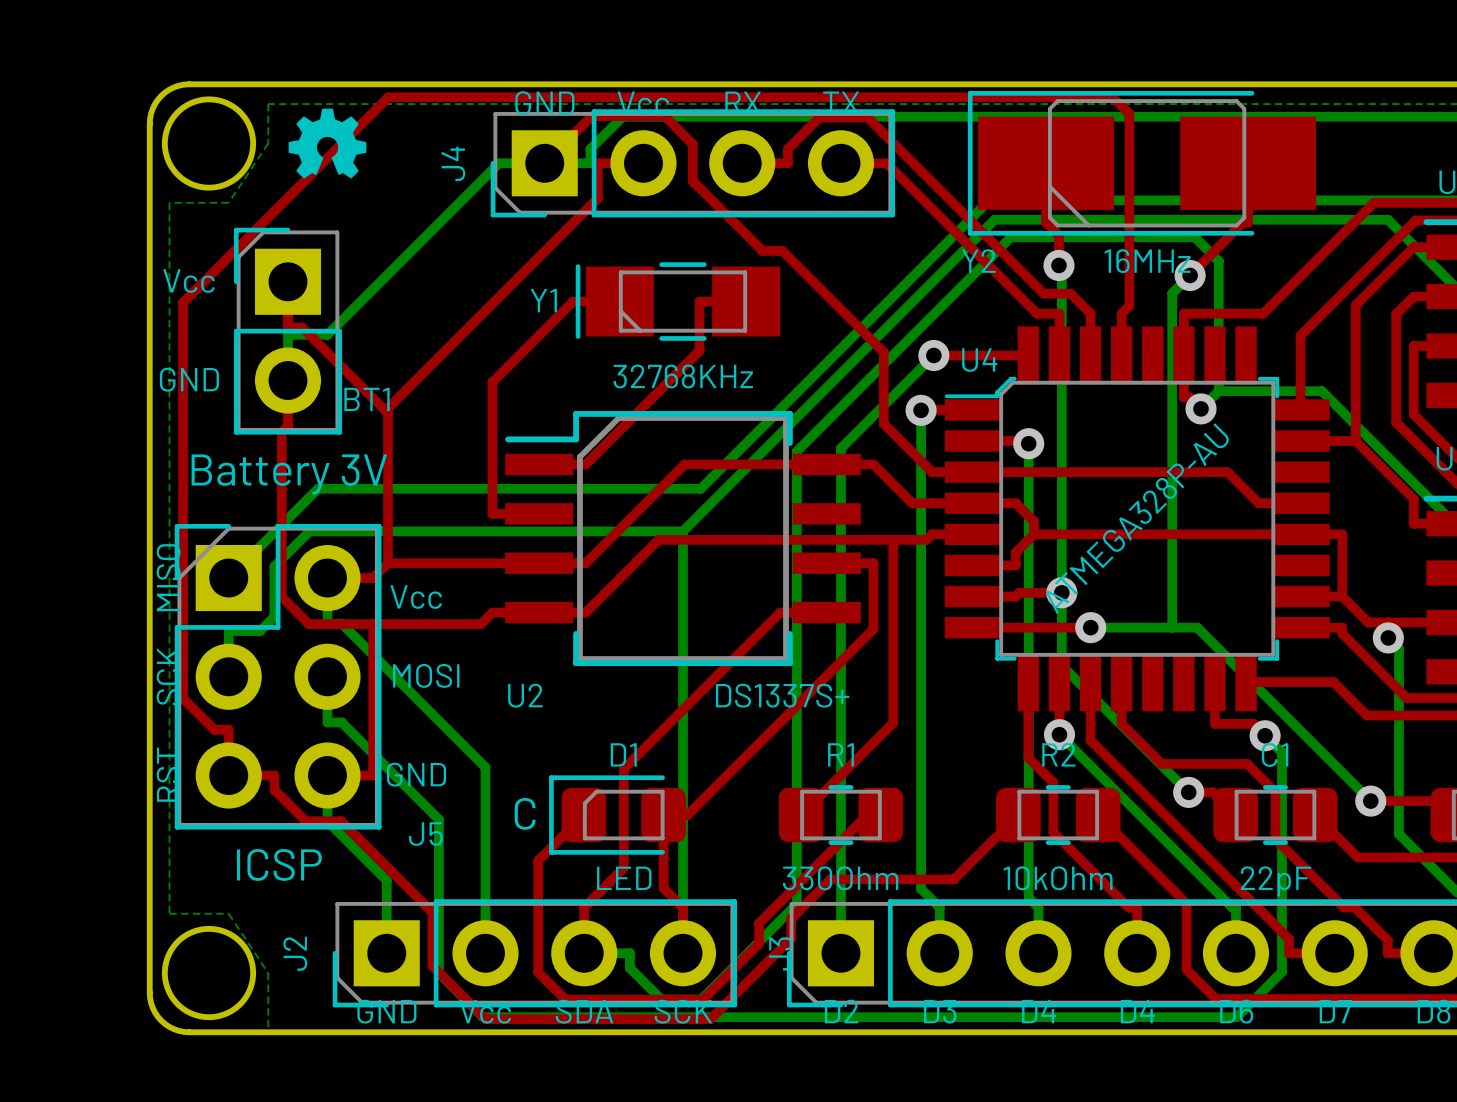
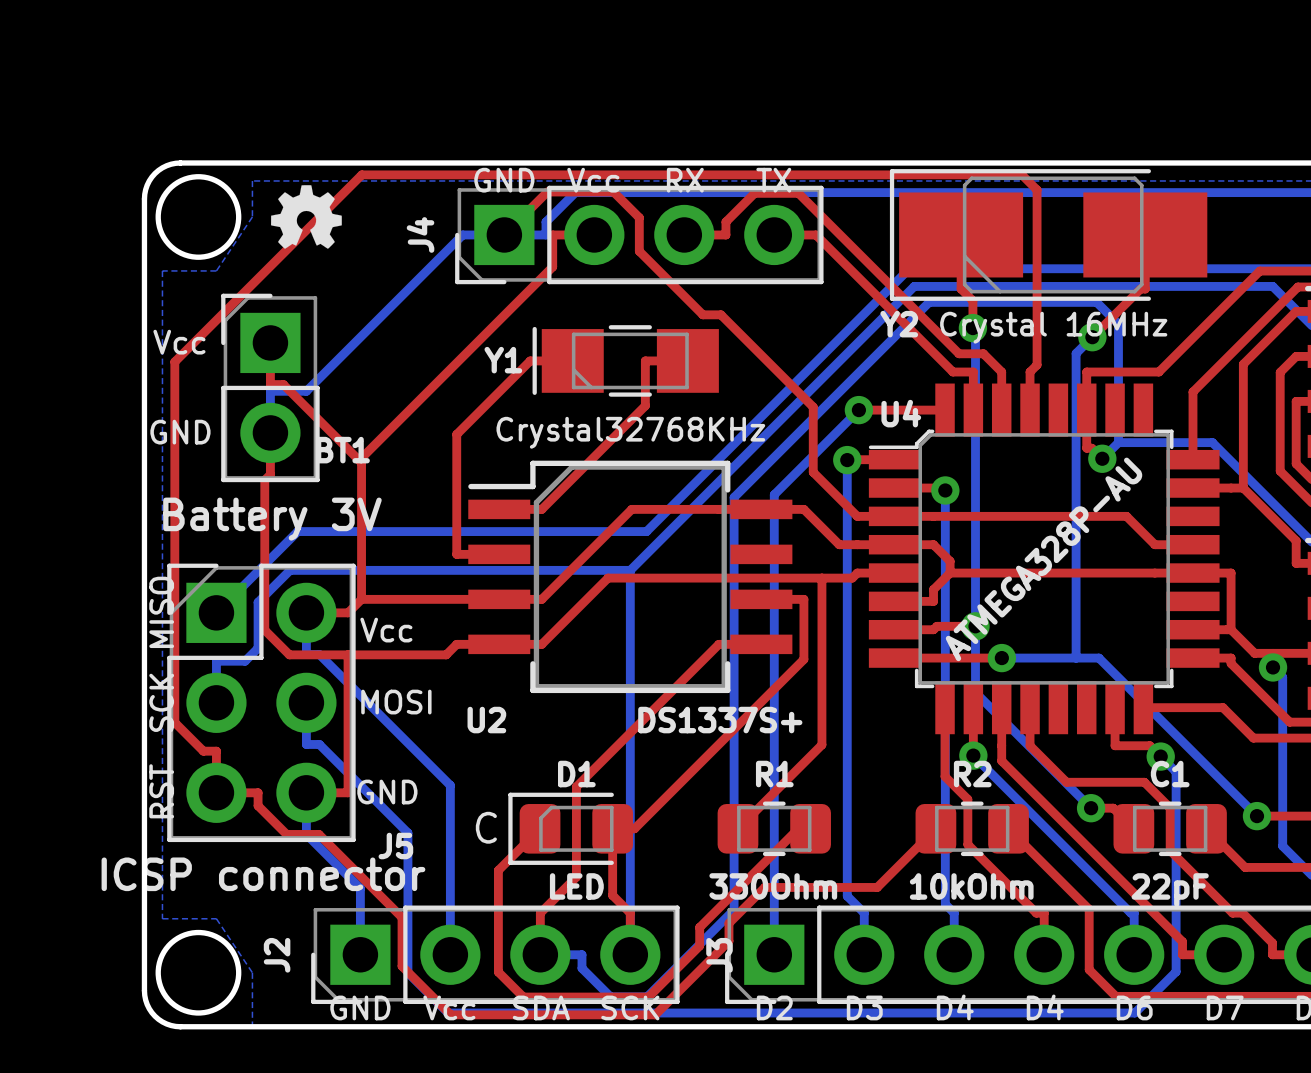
Y2 value: 16MHz (1147, 261) -> Crystal 16MHz (1053, 327)
Y1 value: 32768KHz (683, 376) -> Crystal32768KHz (630, 432)
J5 value: ICSP (279, 864) -> ICSP connector (263, 874)

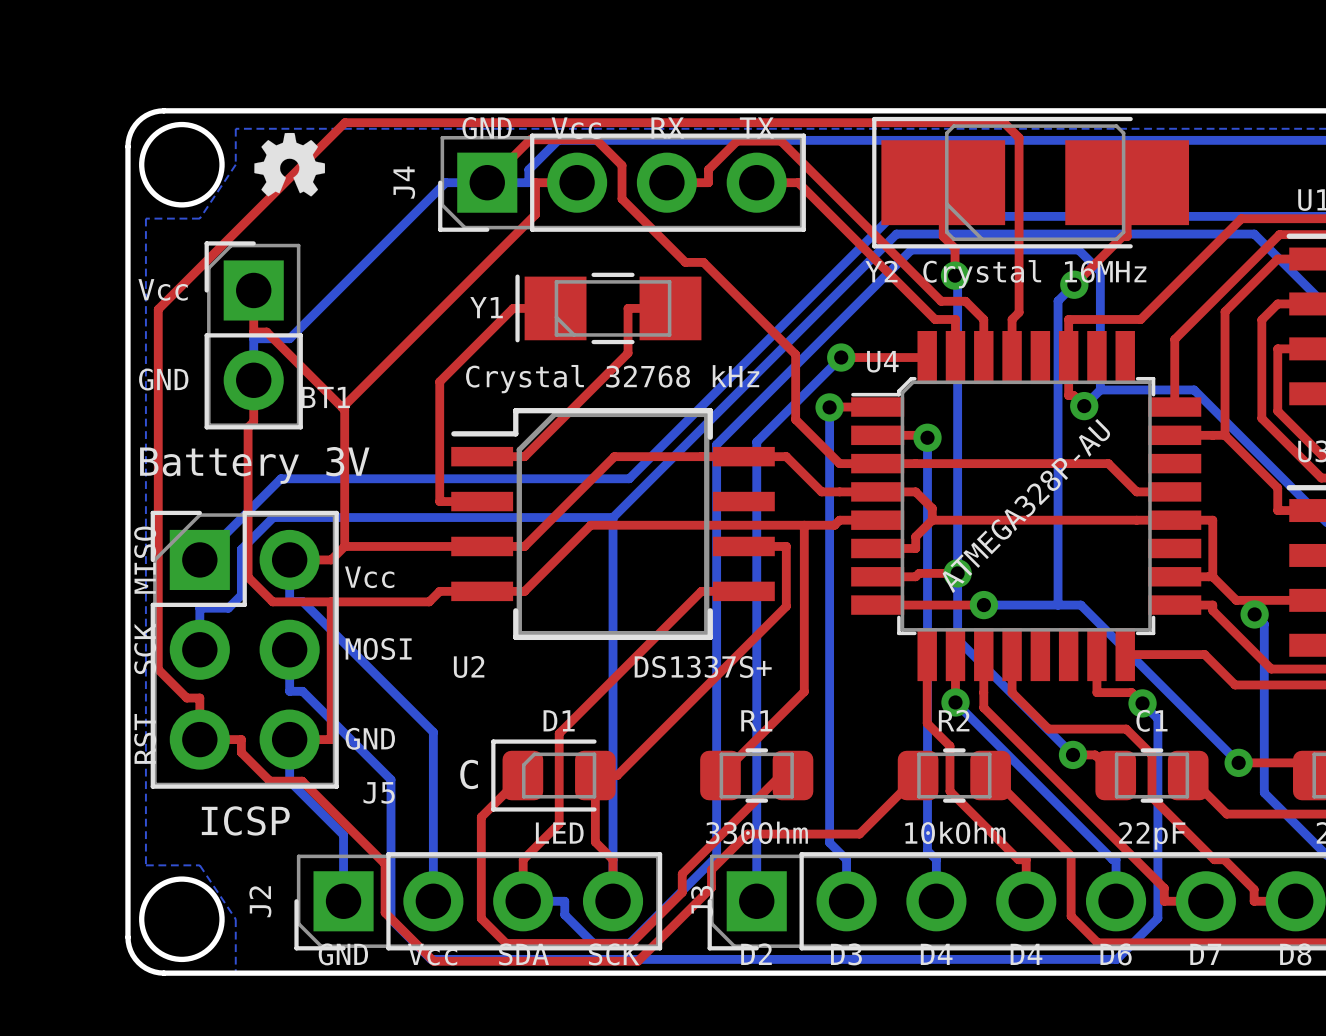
Y1 value: Crystal32768KHz (630, 432) -> Crystal 32768 kHz (612, 379)
J5 value: ICSP connector (263, 874) -> ICSP (245, 820)

